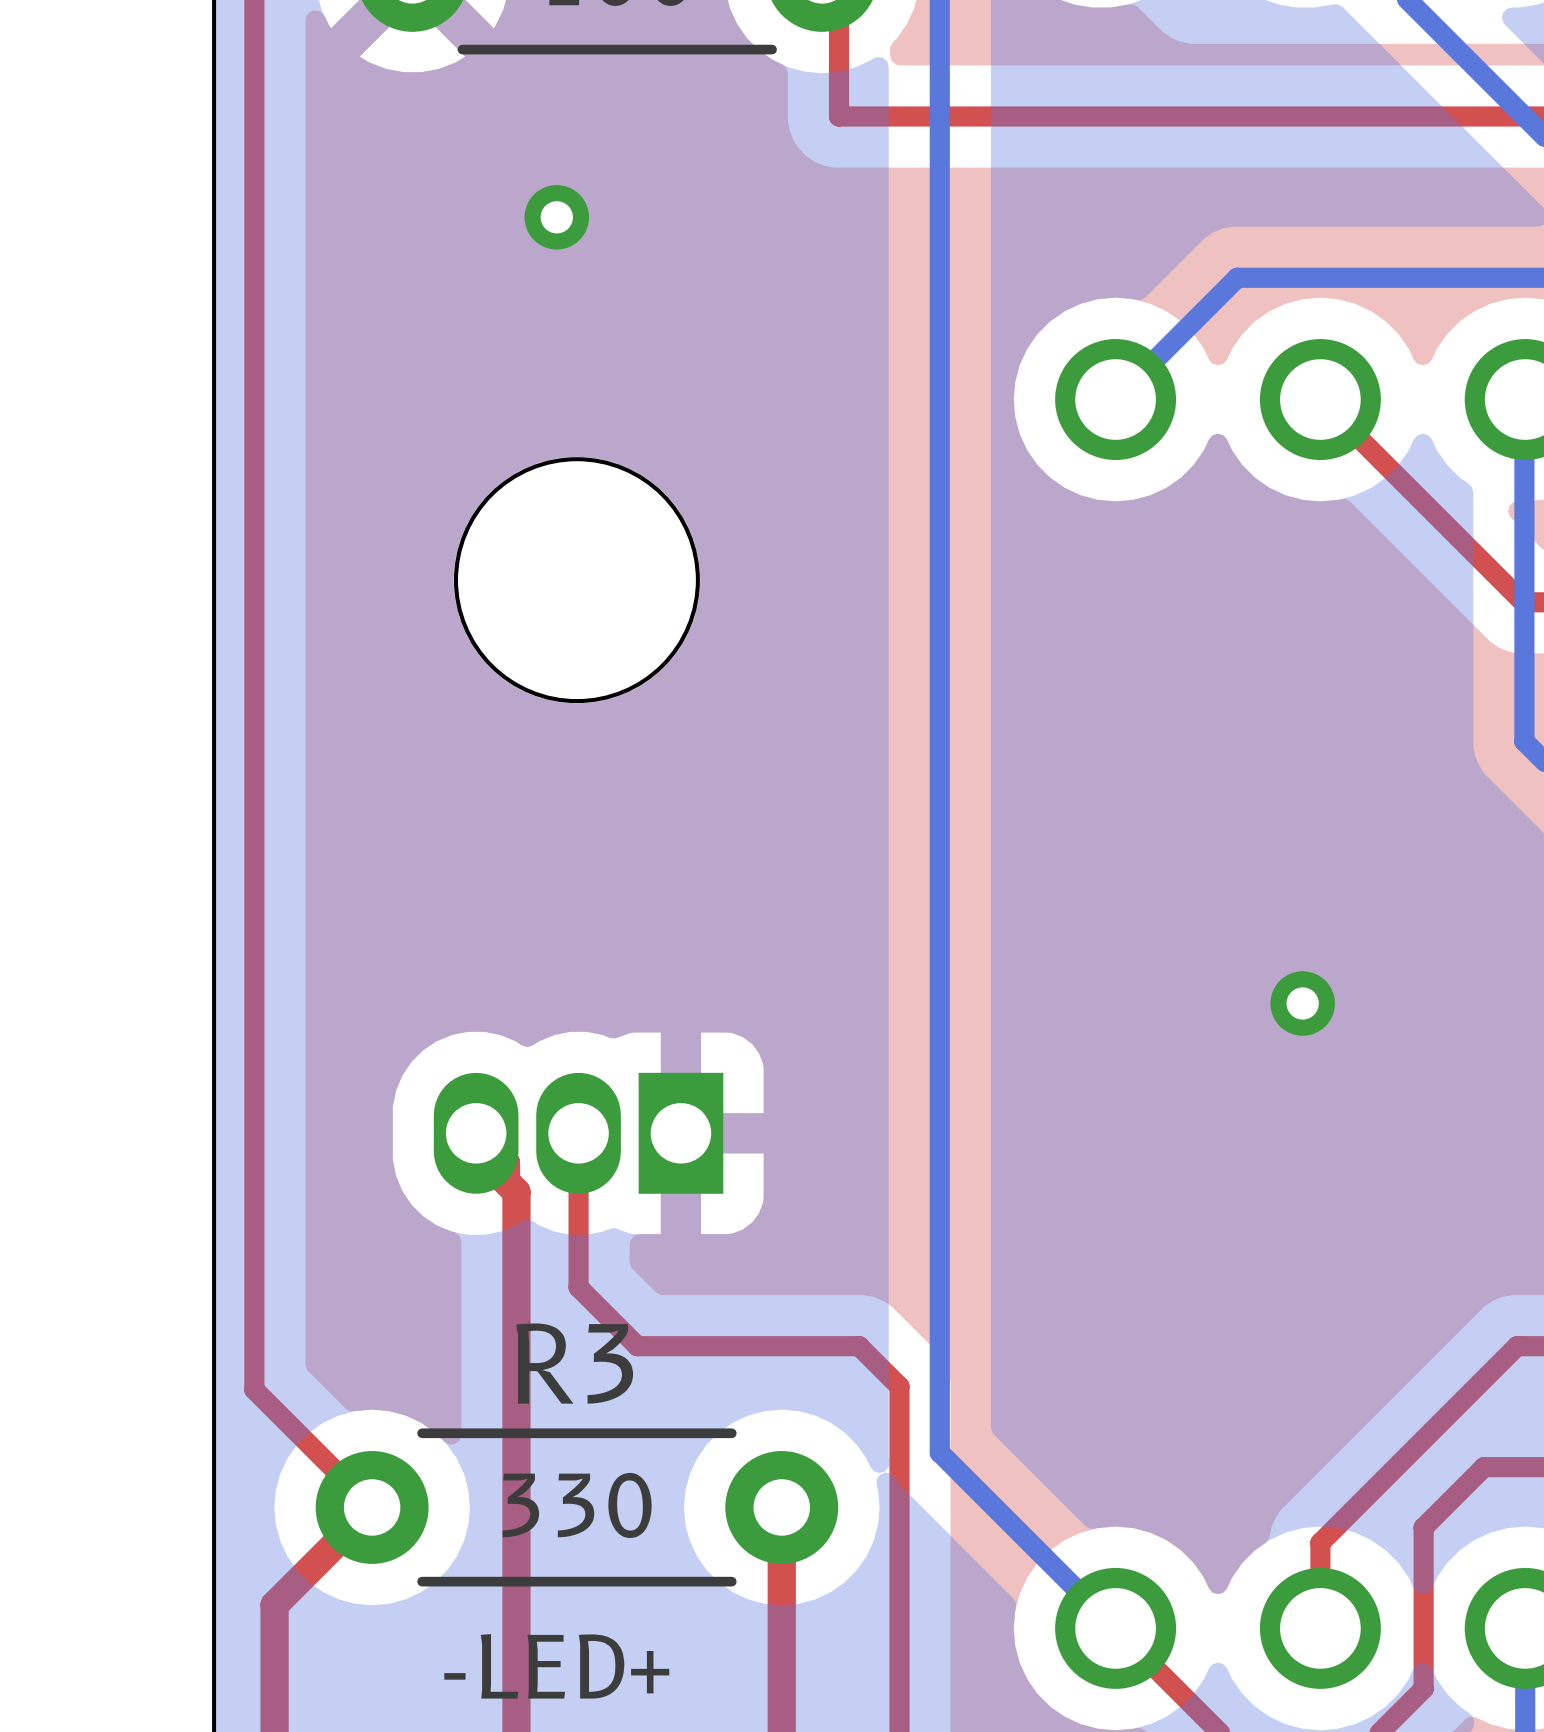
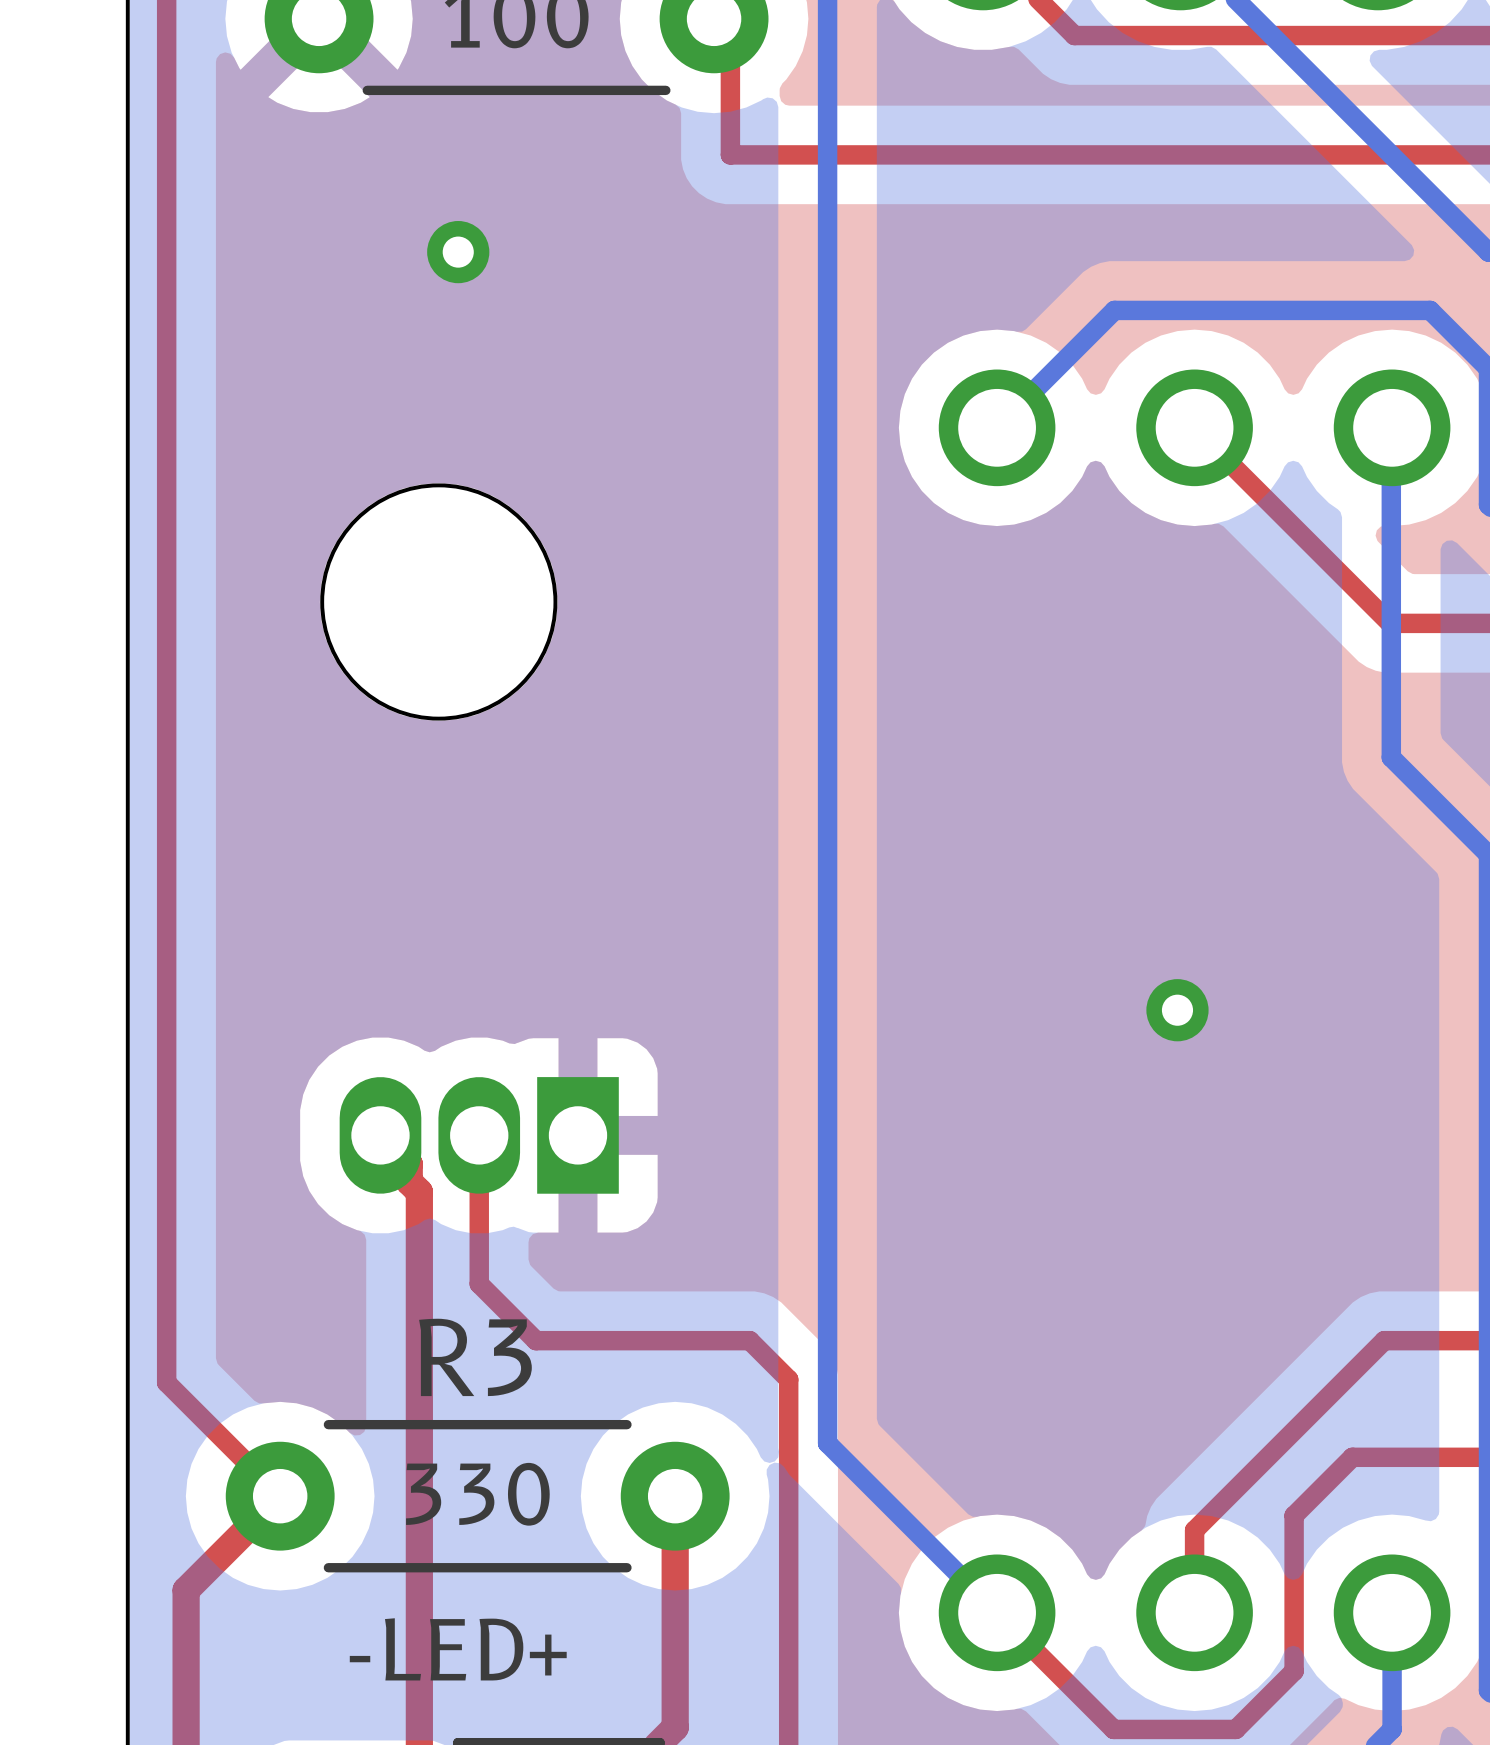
round board edge position: (576, 580) -> (438, 602)

